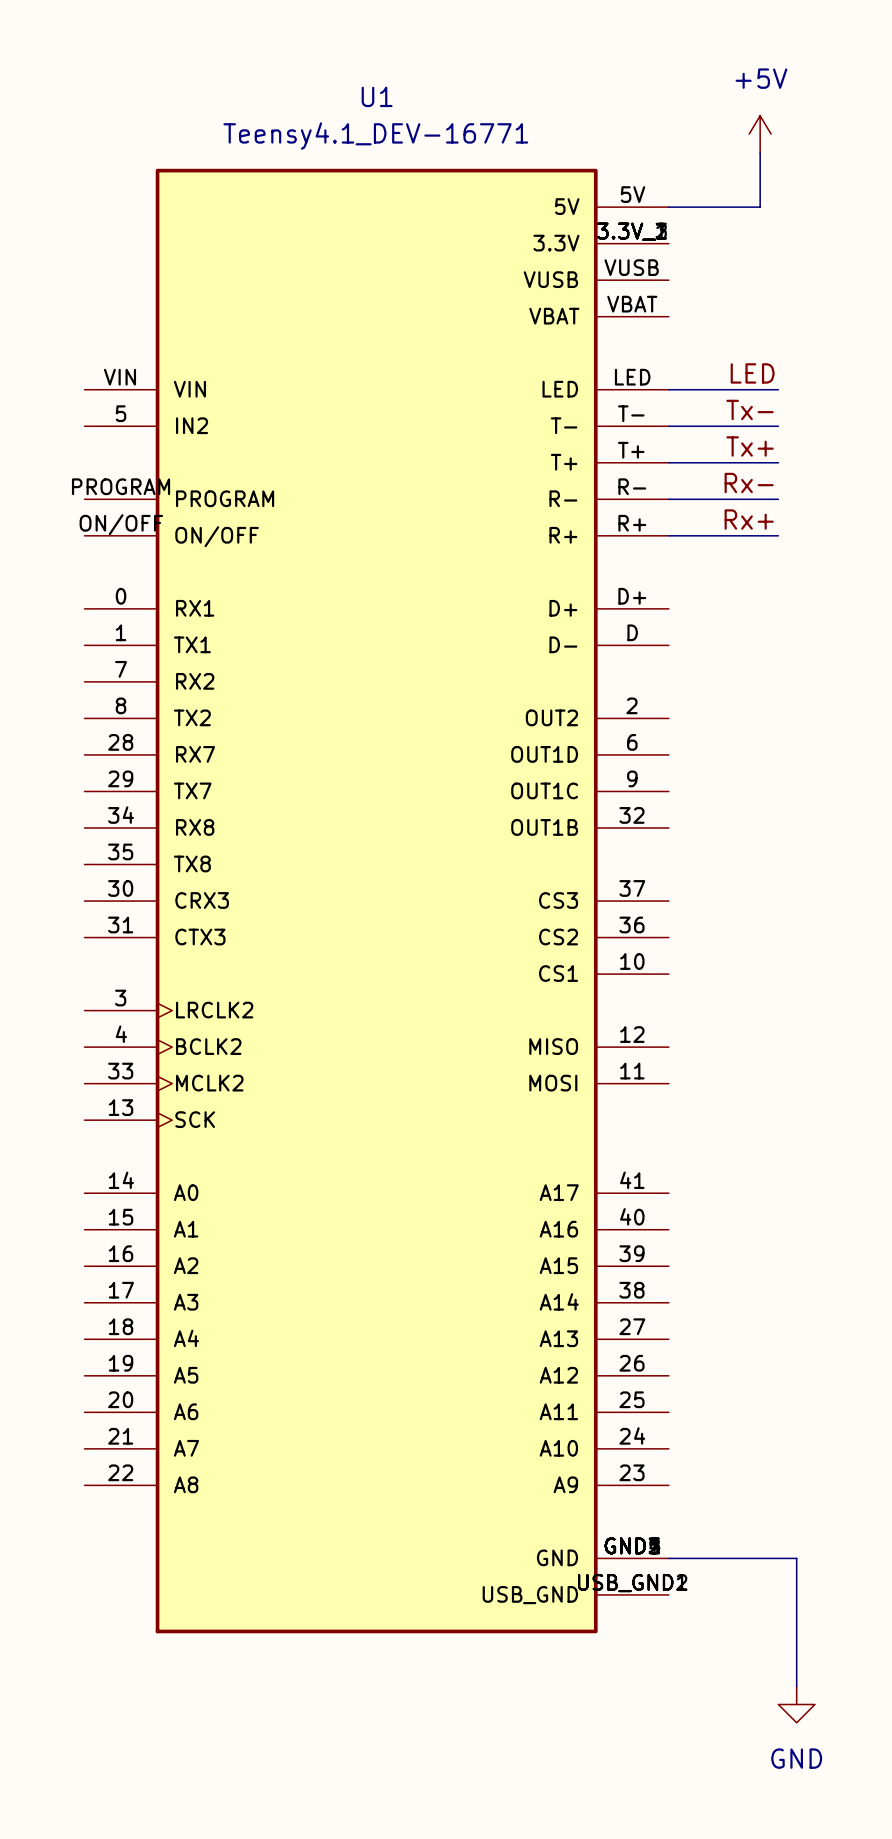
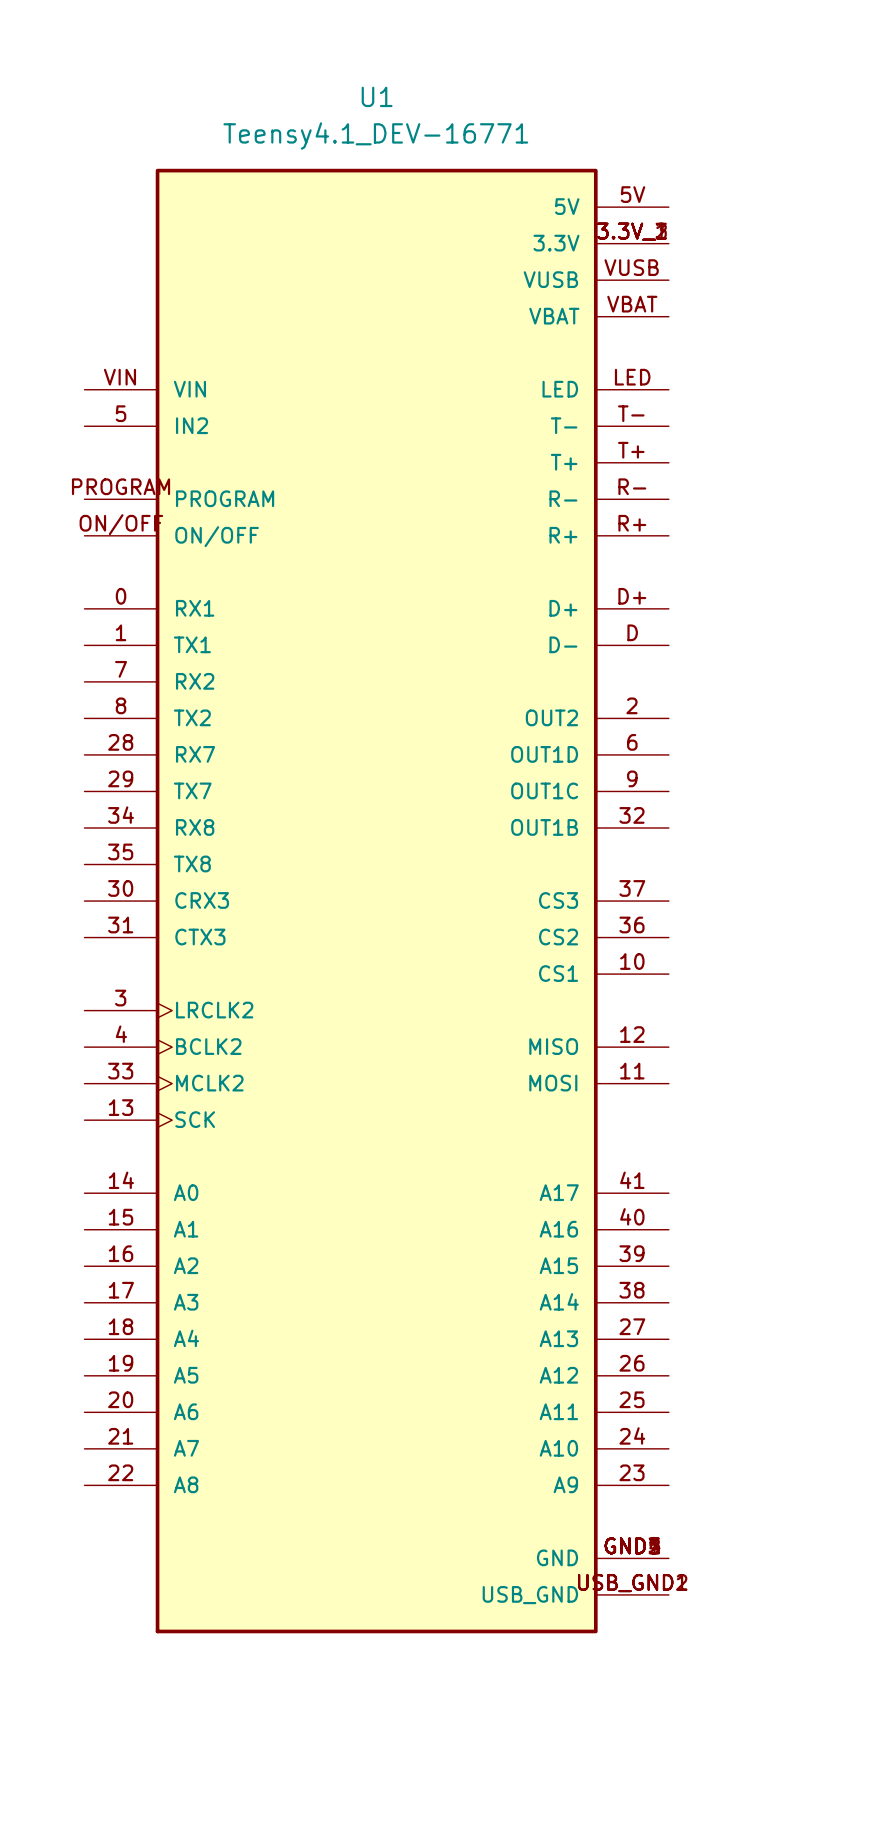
power symbol: +5V (760, 134) -> none
wire: (760, 152) (760, 207) (668, 207) -> none
label: LED (752, 373) -> none
wire: (668, 389) (778, 389) -> none
label: Tx- (750, 409) -> none
wire: (668, 426) (778, 426) -> none
label: Tx+ (750, 446) -> none
wire: (668, 462) (778, 462) -> none
label: Rx- (749, 483) -> none
wire: (668, 499) (778, 499) -> none
label: Rx+ (749, 519) -> none
wire: (668, 535) (778, 535) -> none
wire: (668, 1558) (796, 1558) (796, 1686) -> none
power symbol: GND (796, 1704) -> none

